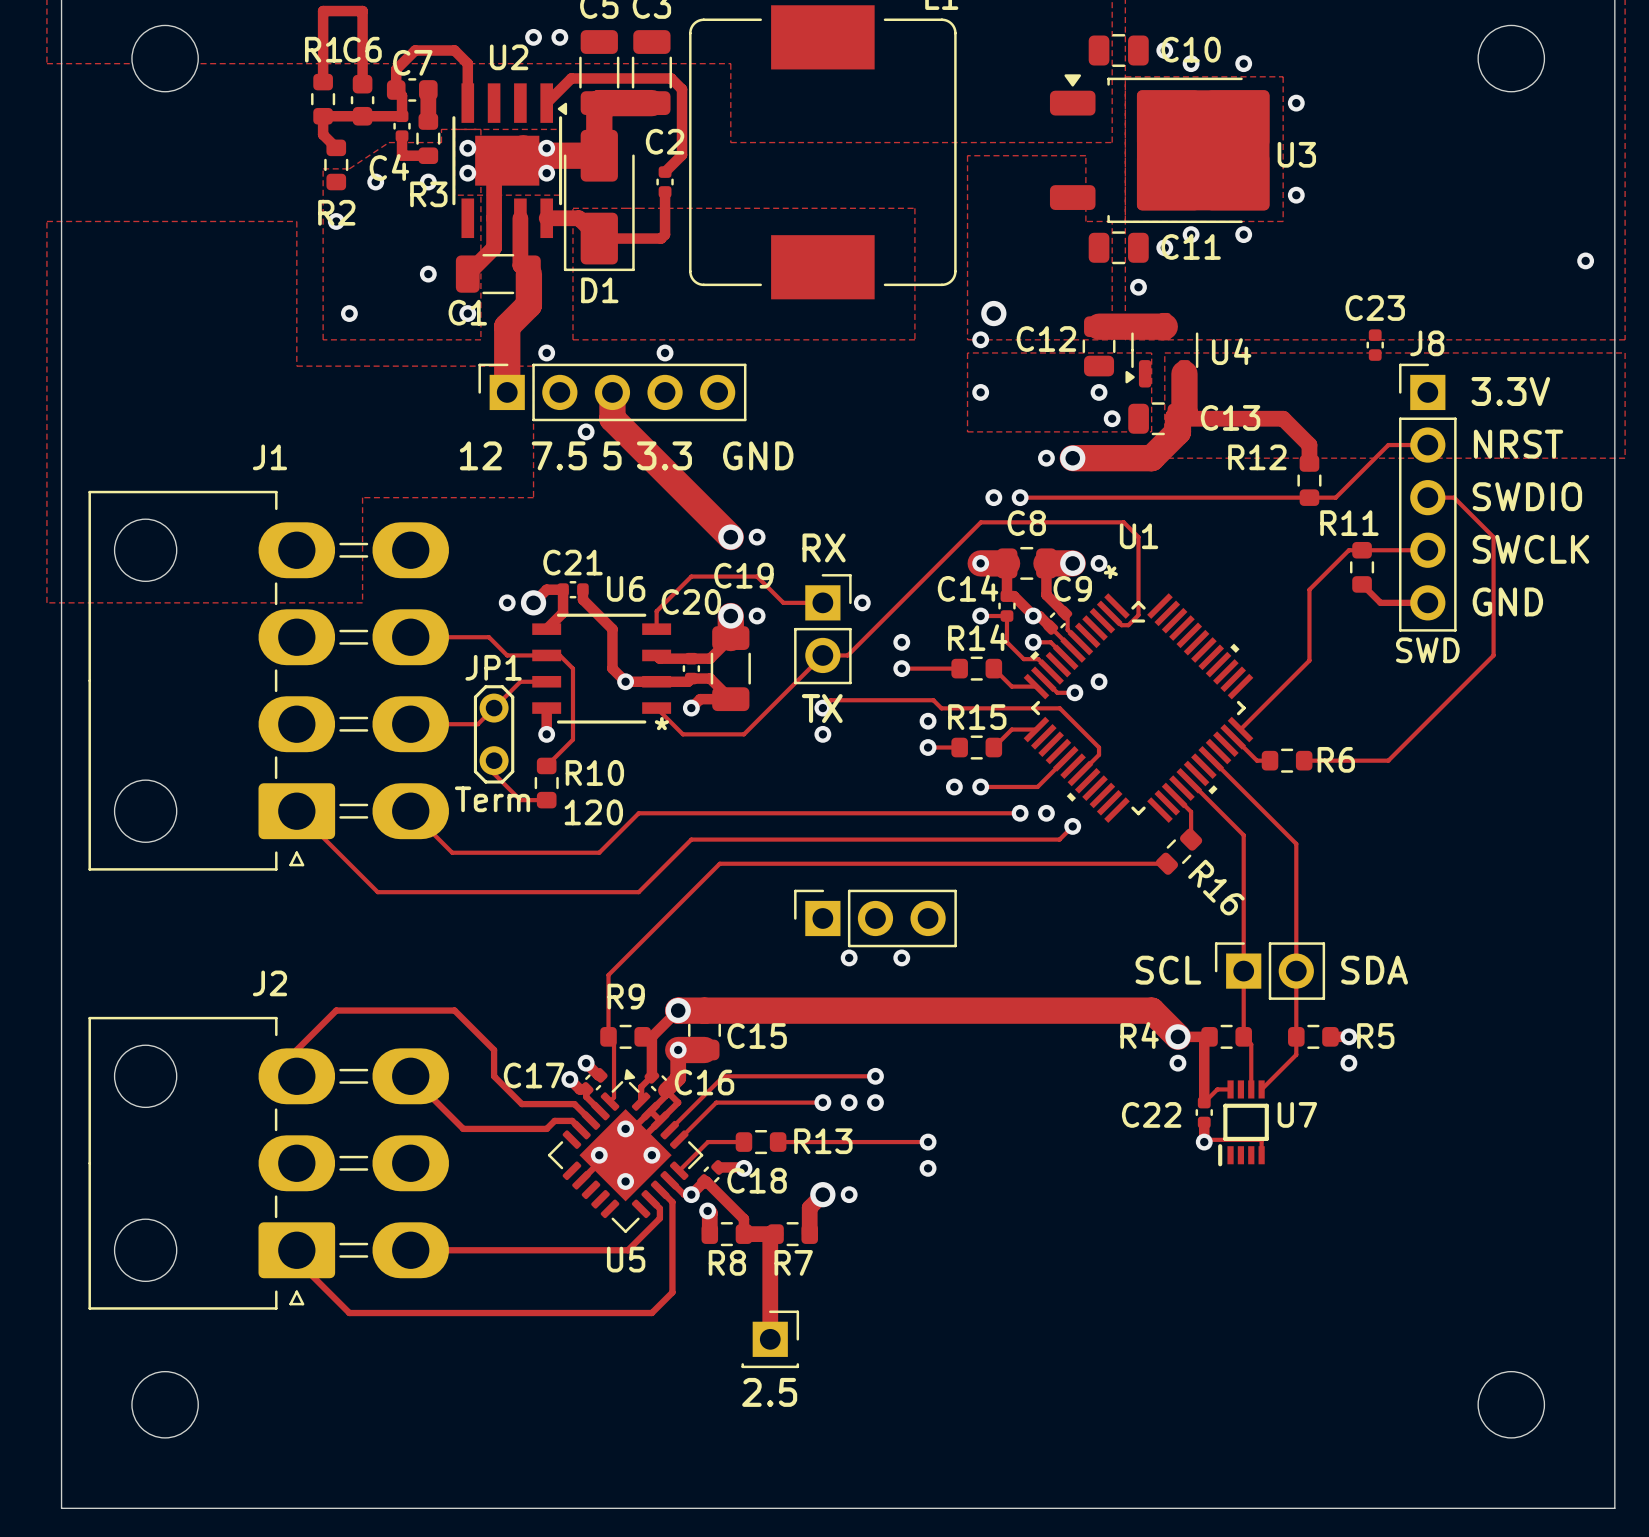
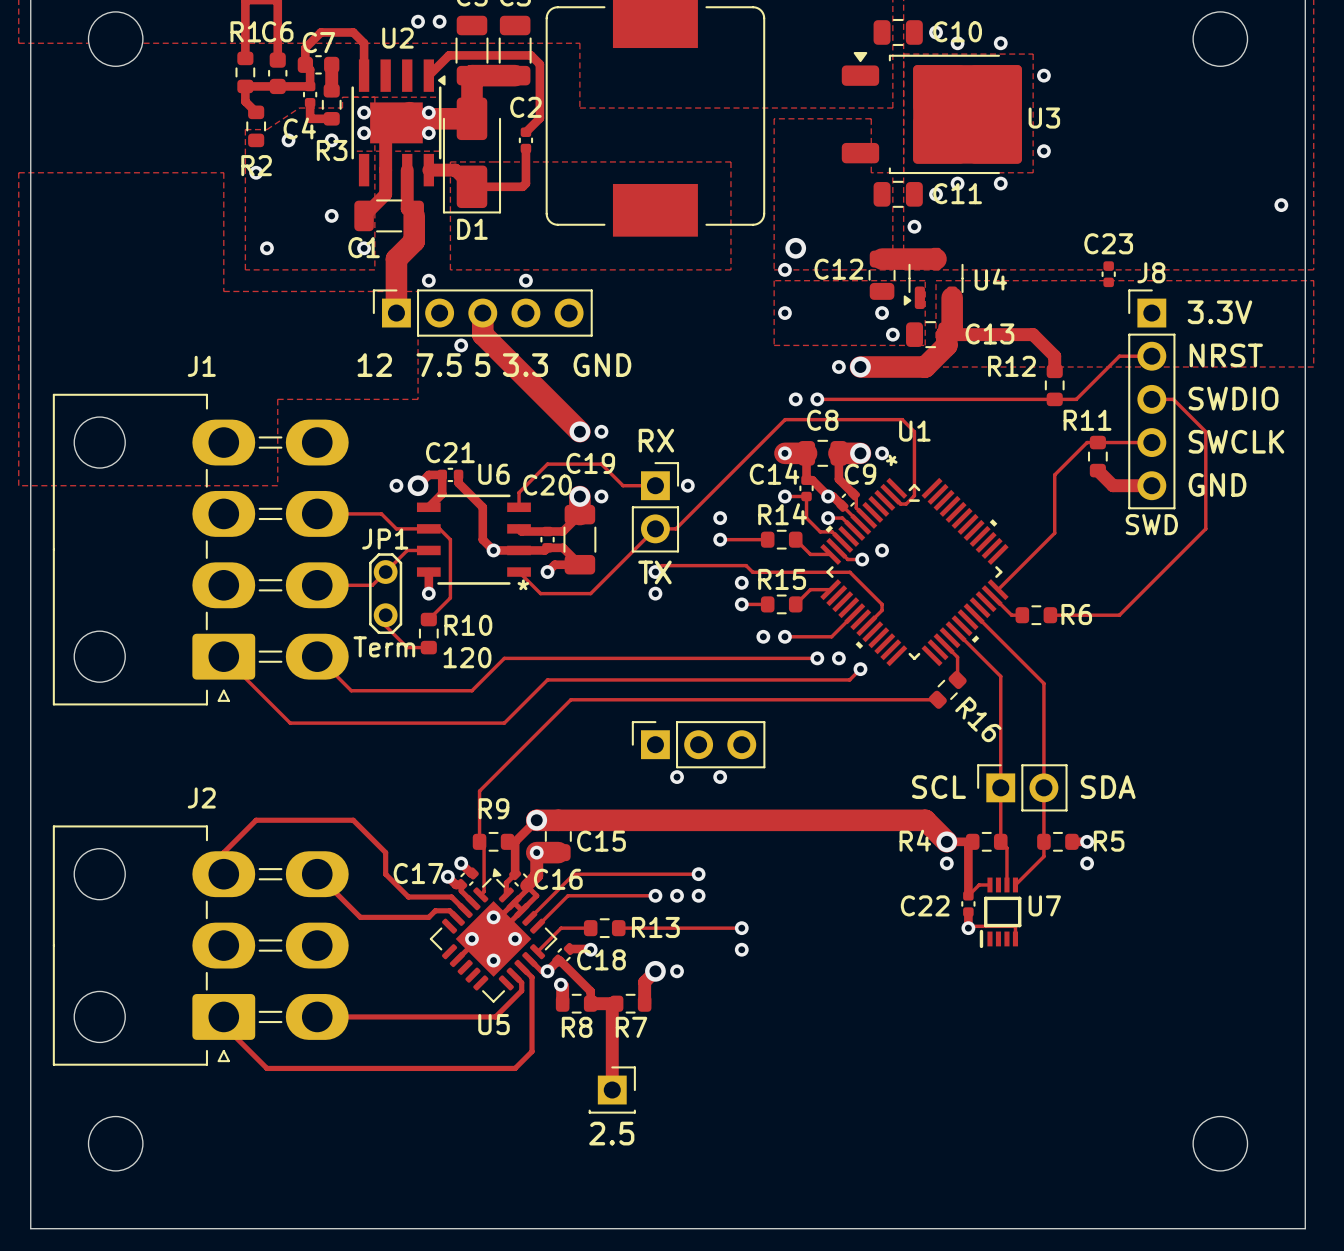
track width: thin (1362, 584) (1380, 602) (1427, 602) -> thick (1097, 470) (1113, 485) (1151, 485)

